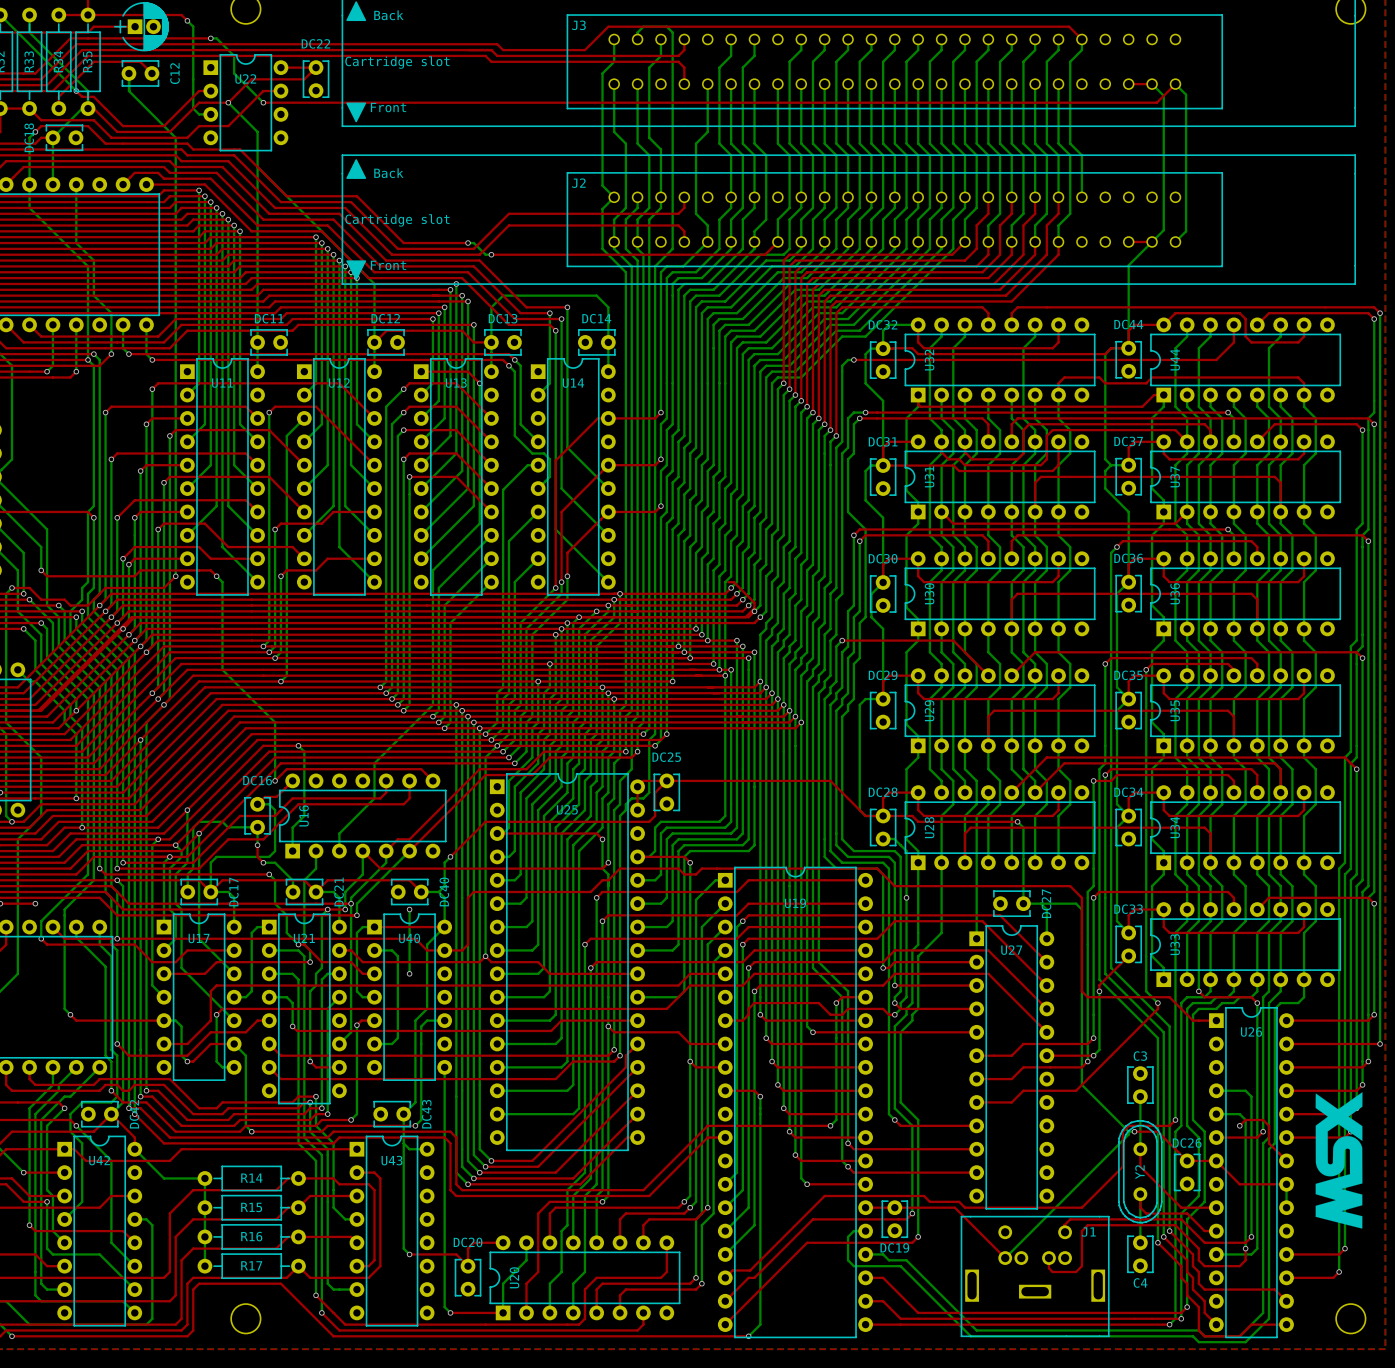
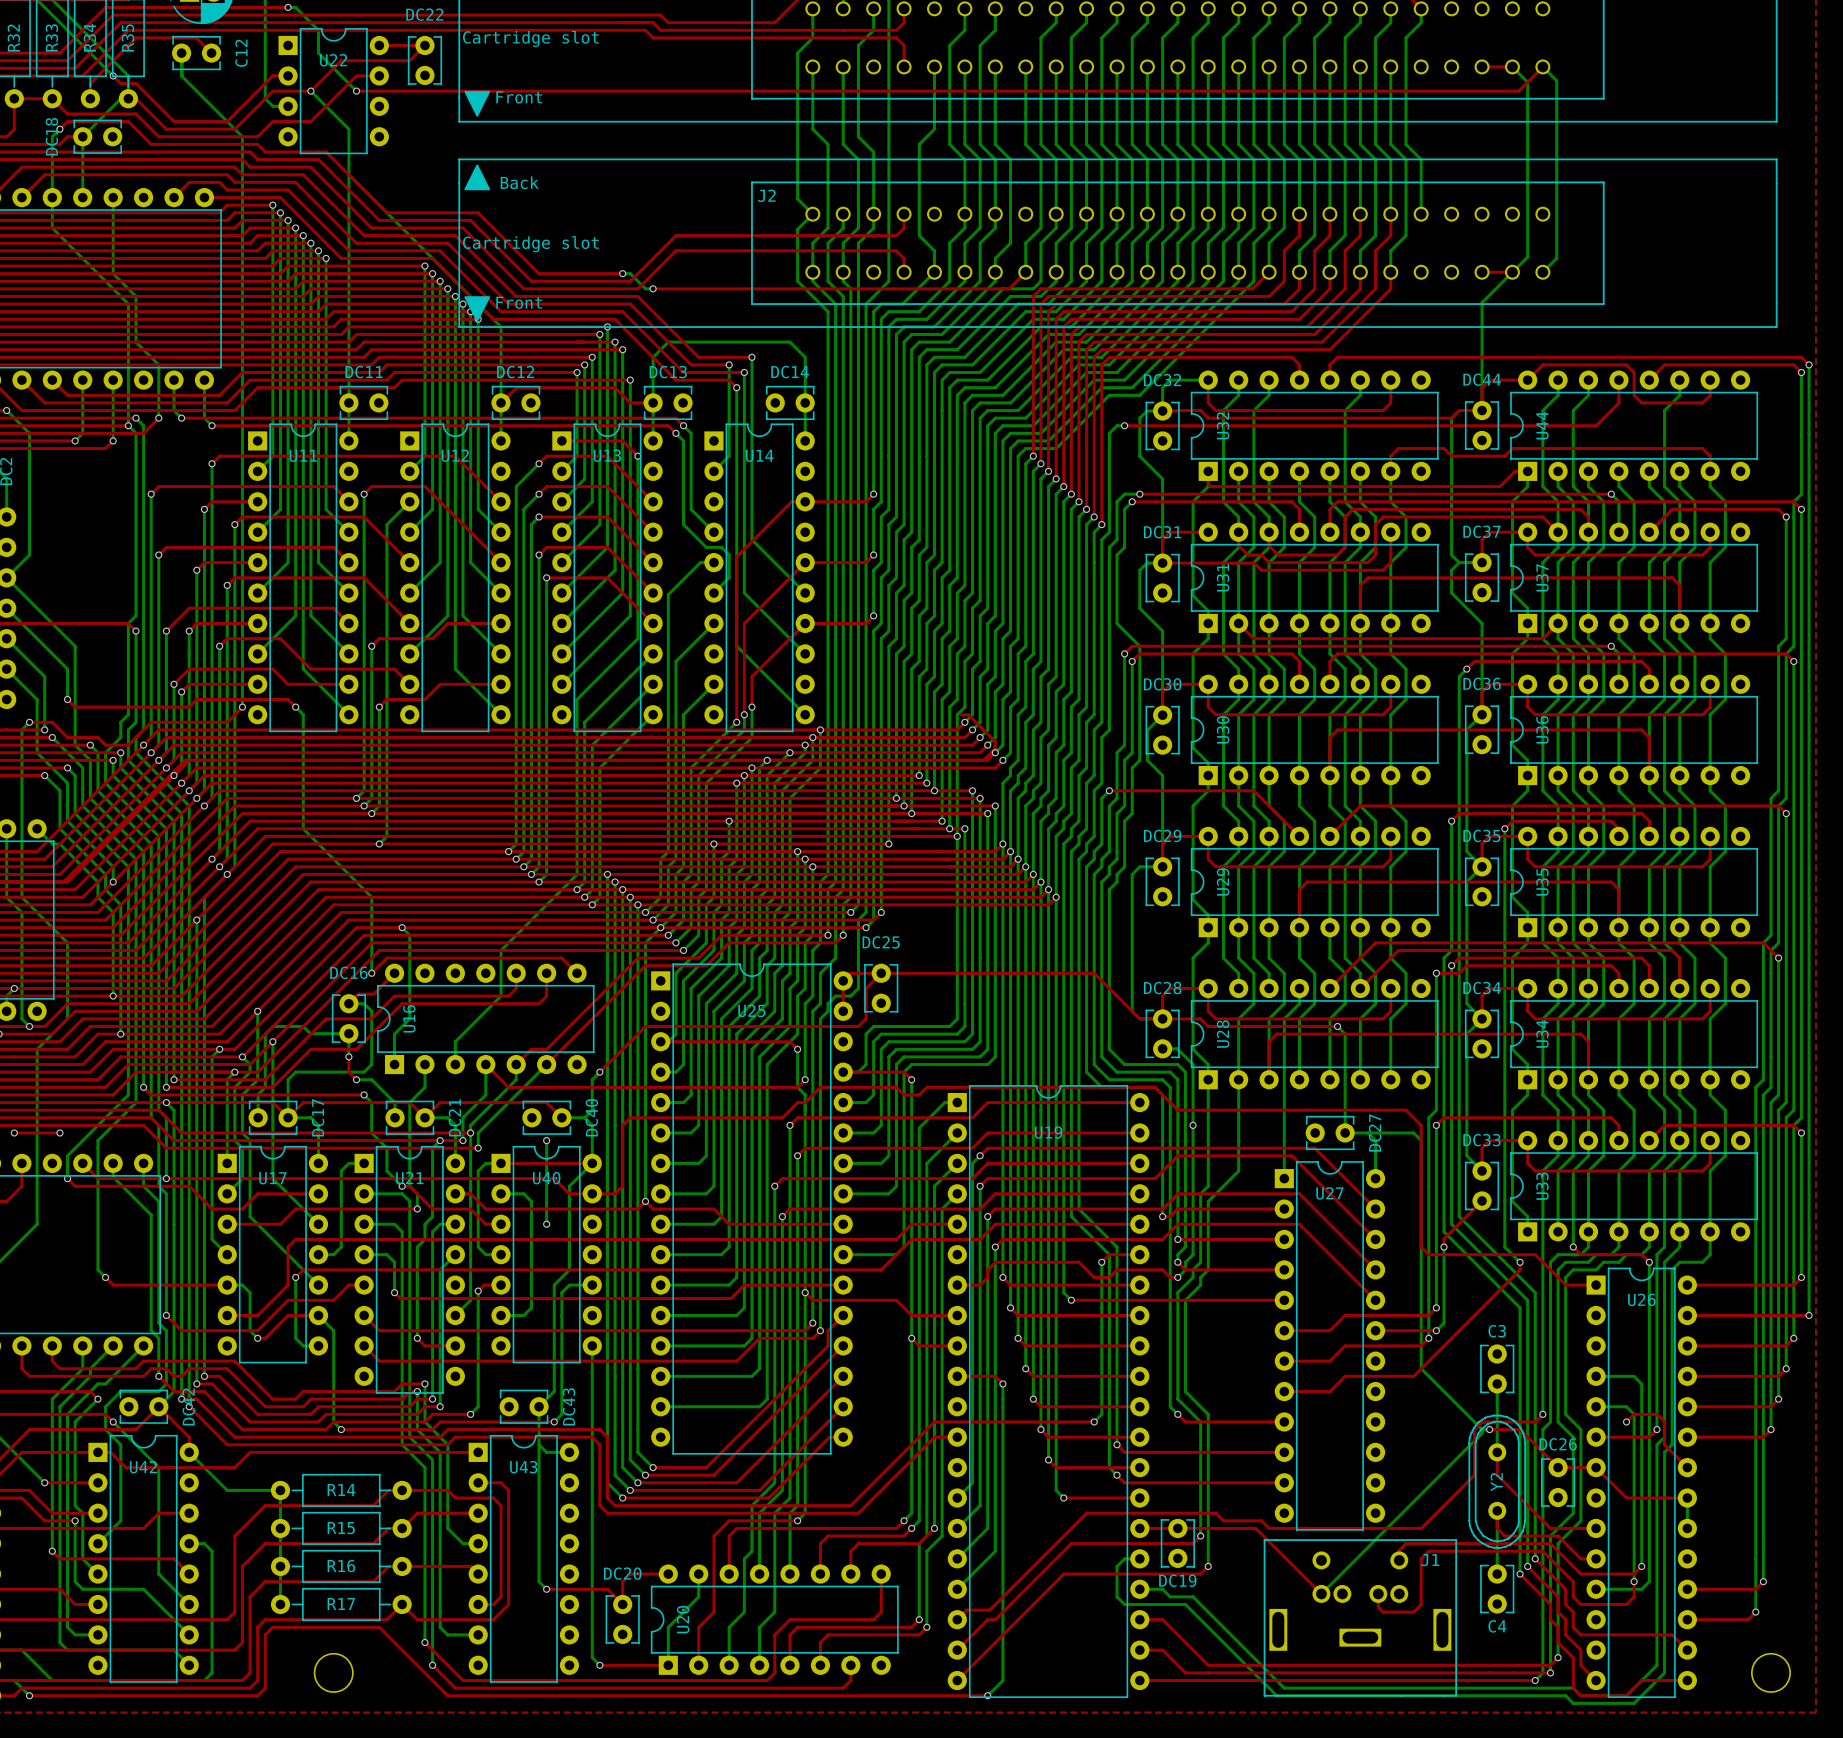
drawing: [1315, 1092, 1363, 1229] -> none

